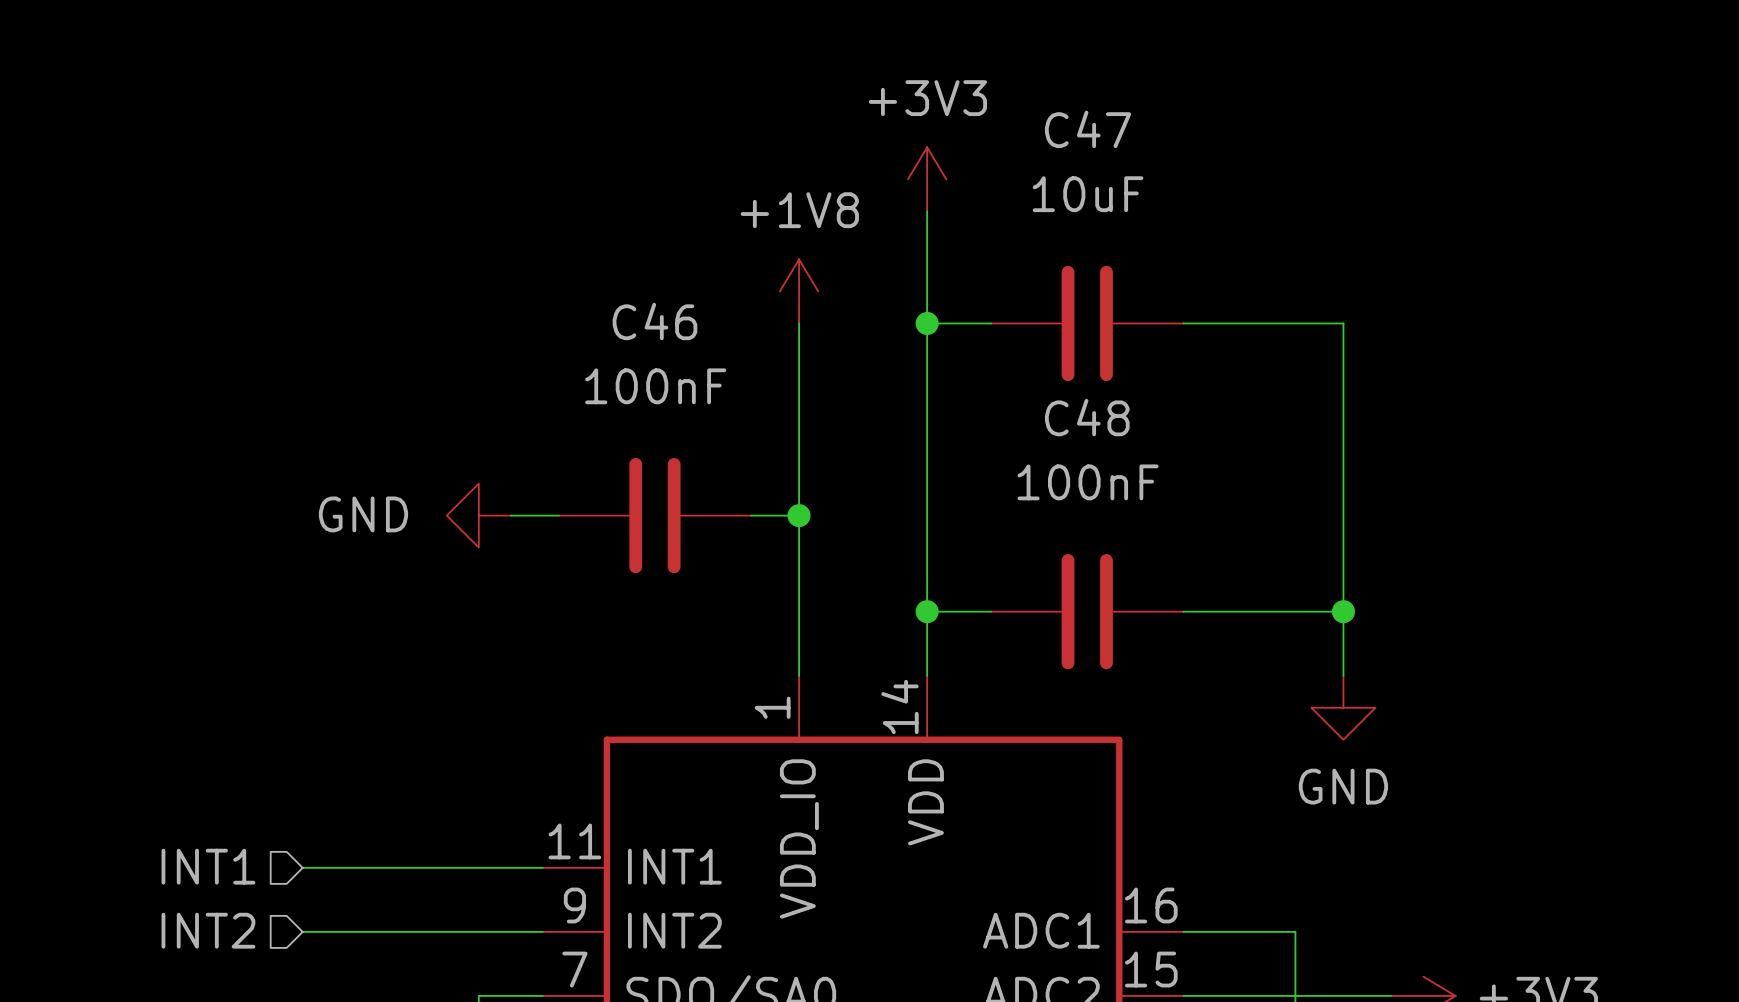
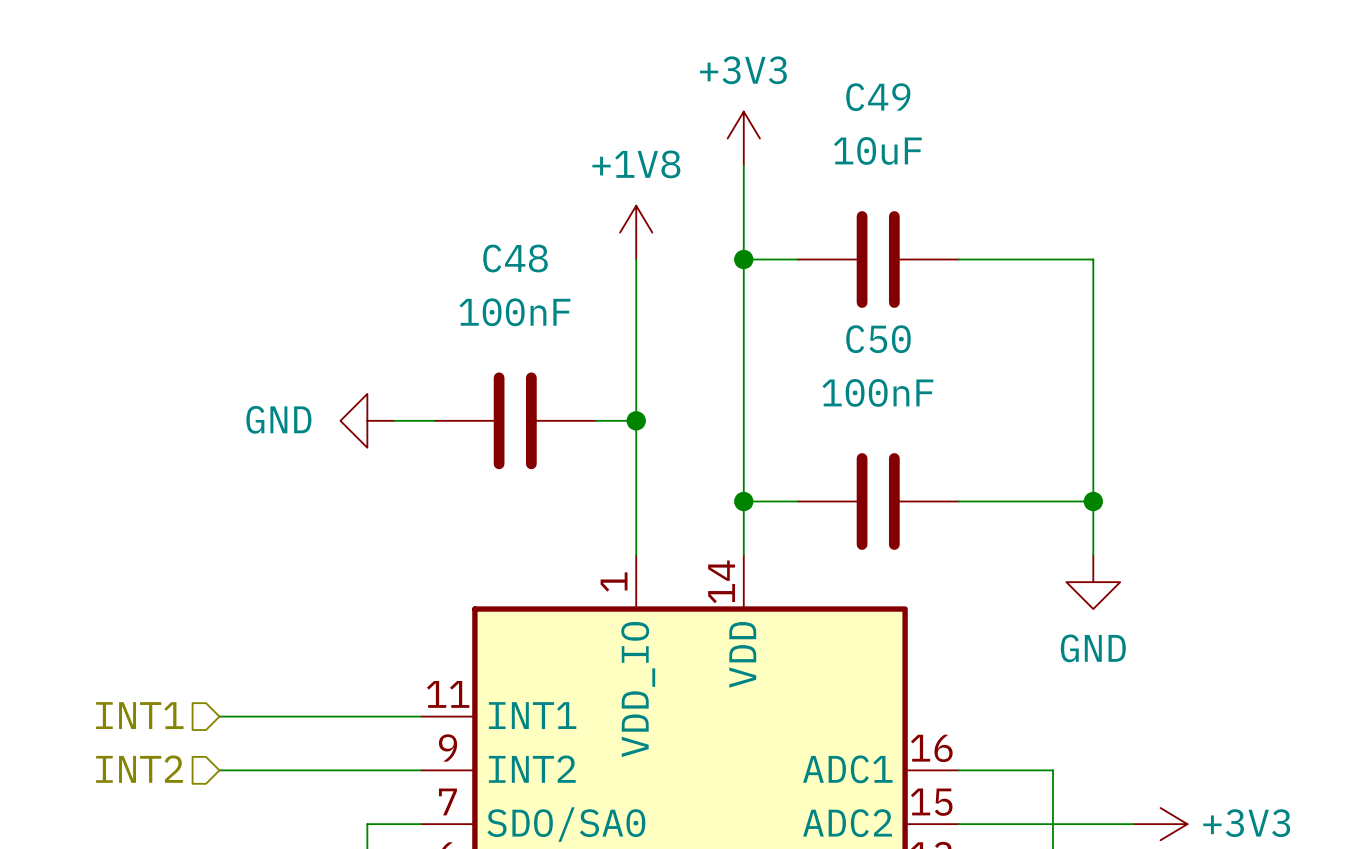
C47 name: C47 (1088, 129) -> C49 (878, 97)
C46 name: C46 (654, 321) -> C48 (515, 258)
C48 name: C48 (1087, 417) -> C50 (878, 339)

